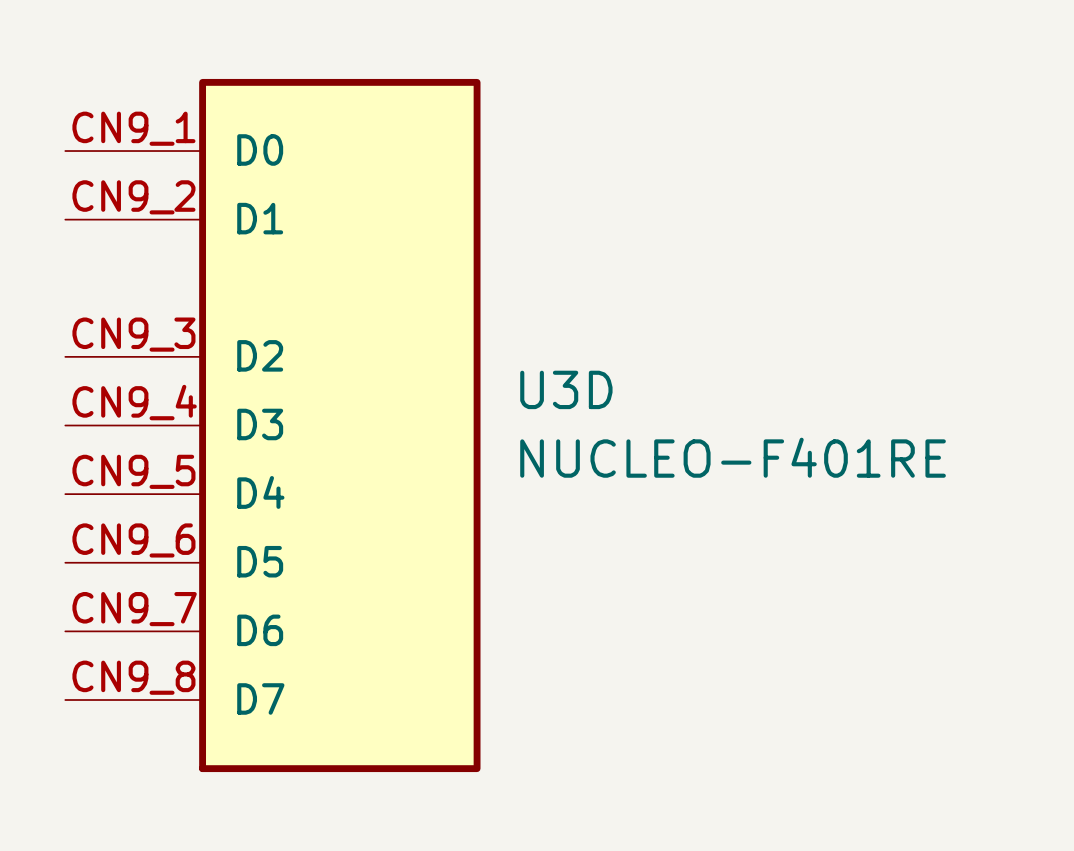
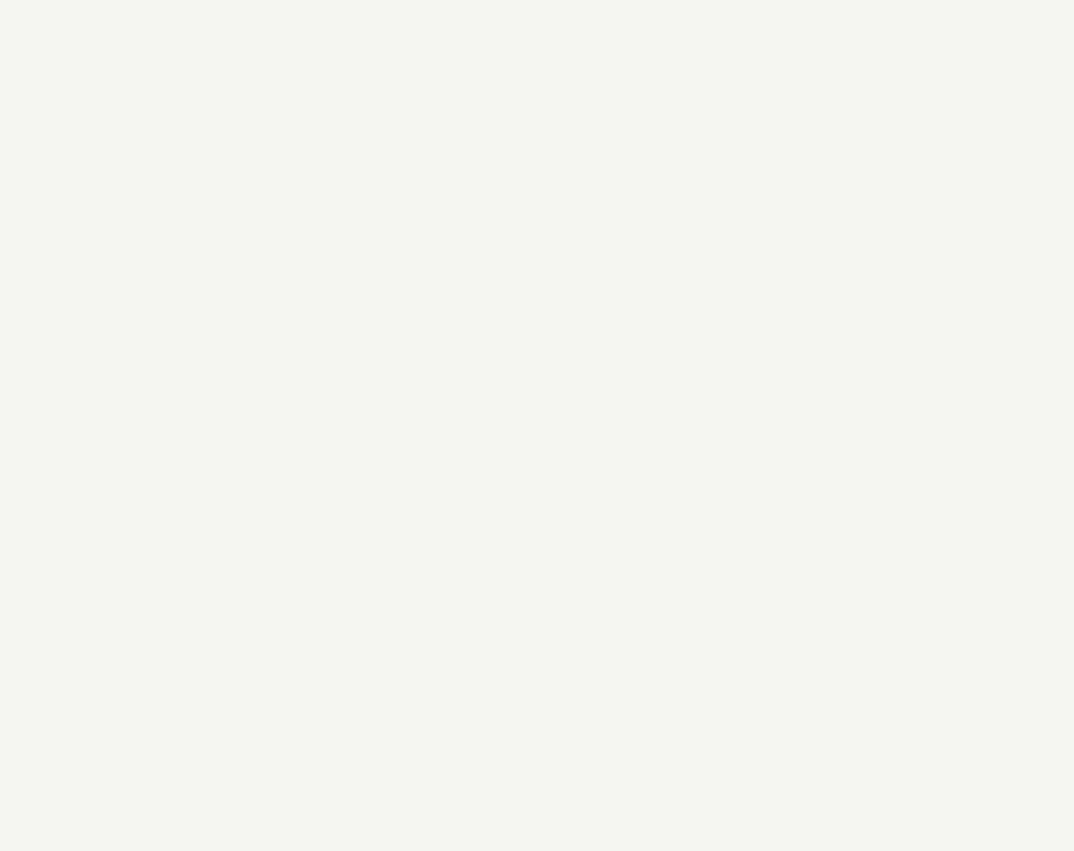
U3D: NUCLEO-F401RE (272, 425) -> none

